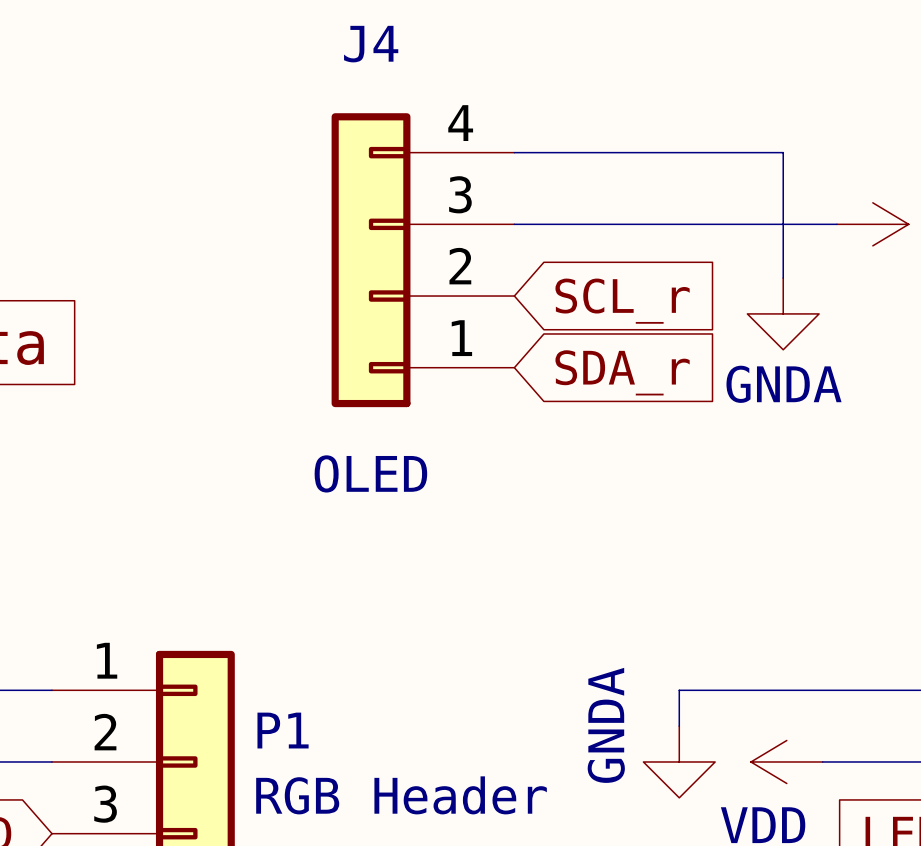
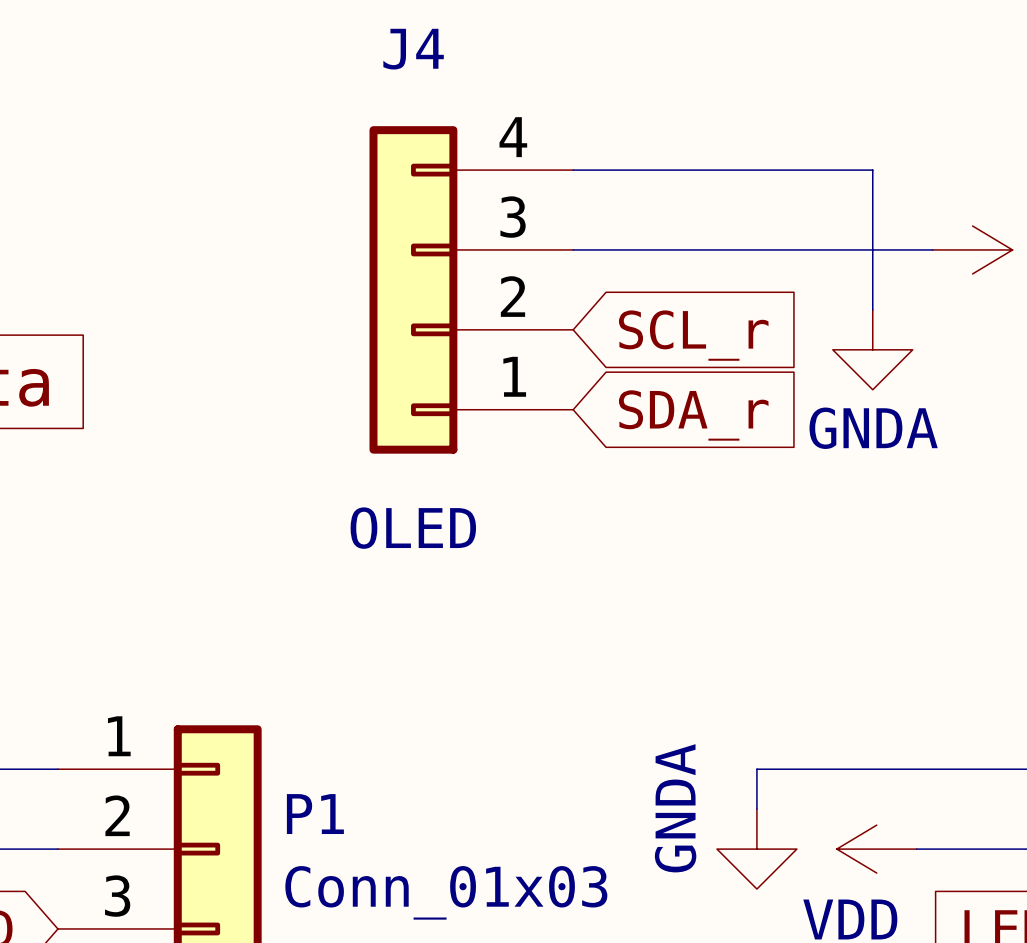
P1 value: RGB Header (401, 795) -> Conn_01x03 (446, 892)

